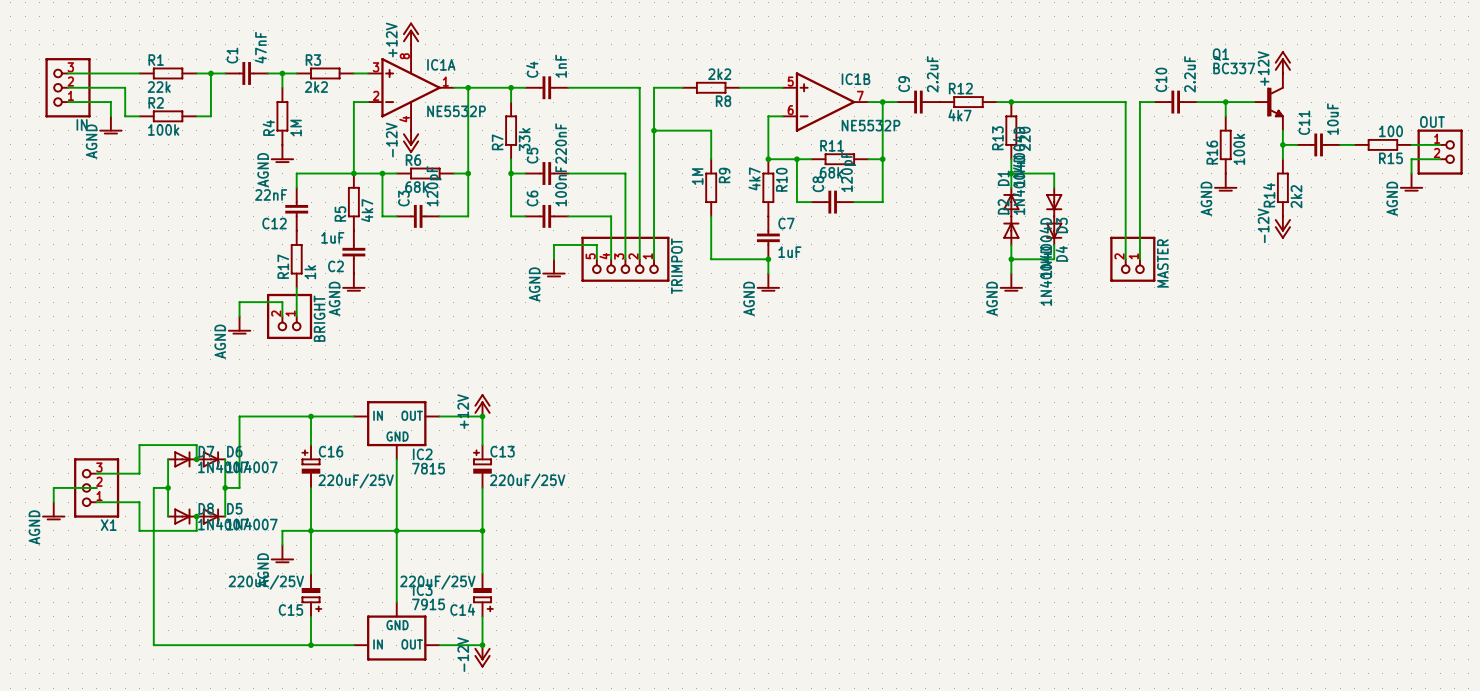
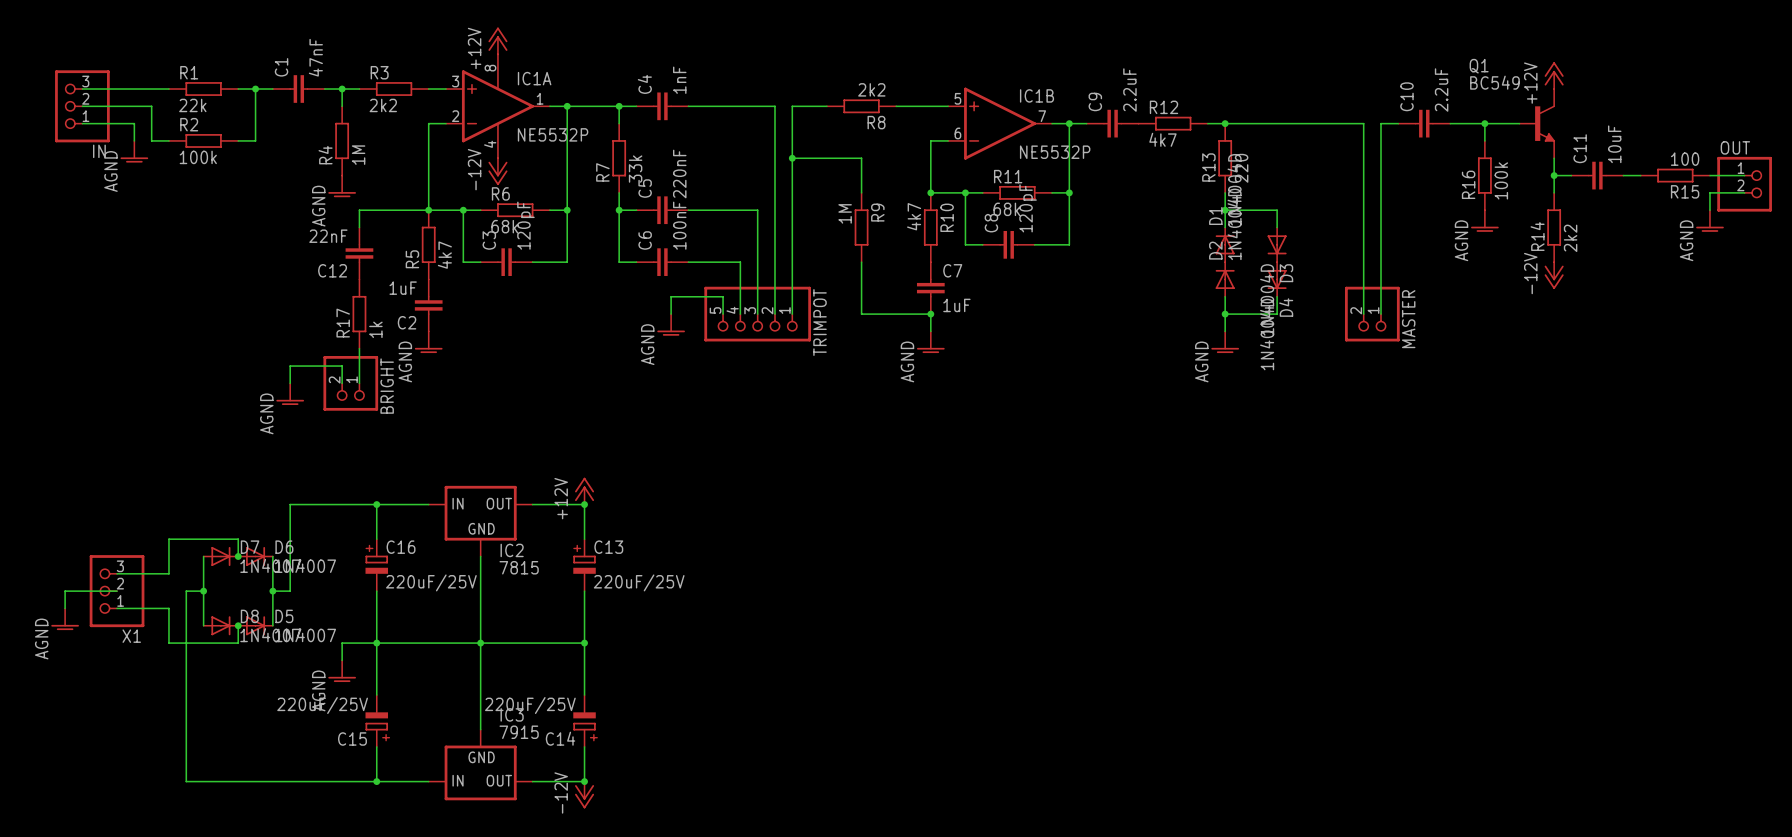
Q1 value: BC337 (1234, 68) -> BC549 (1494, 82)

